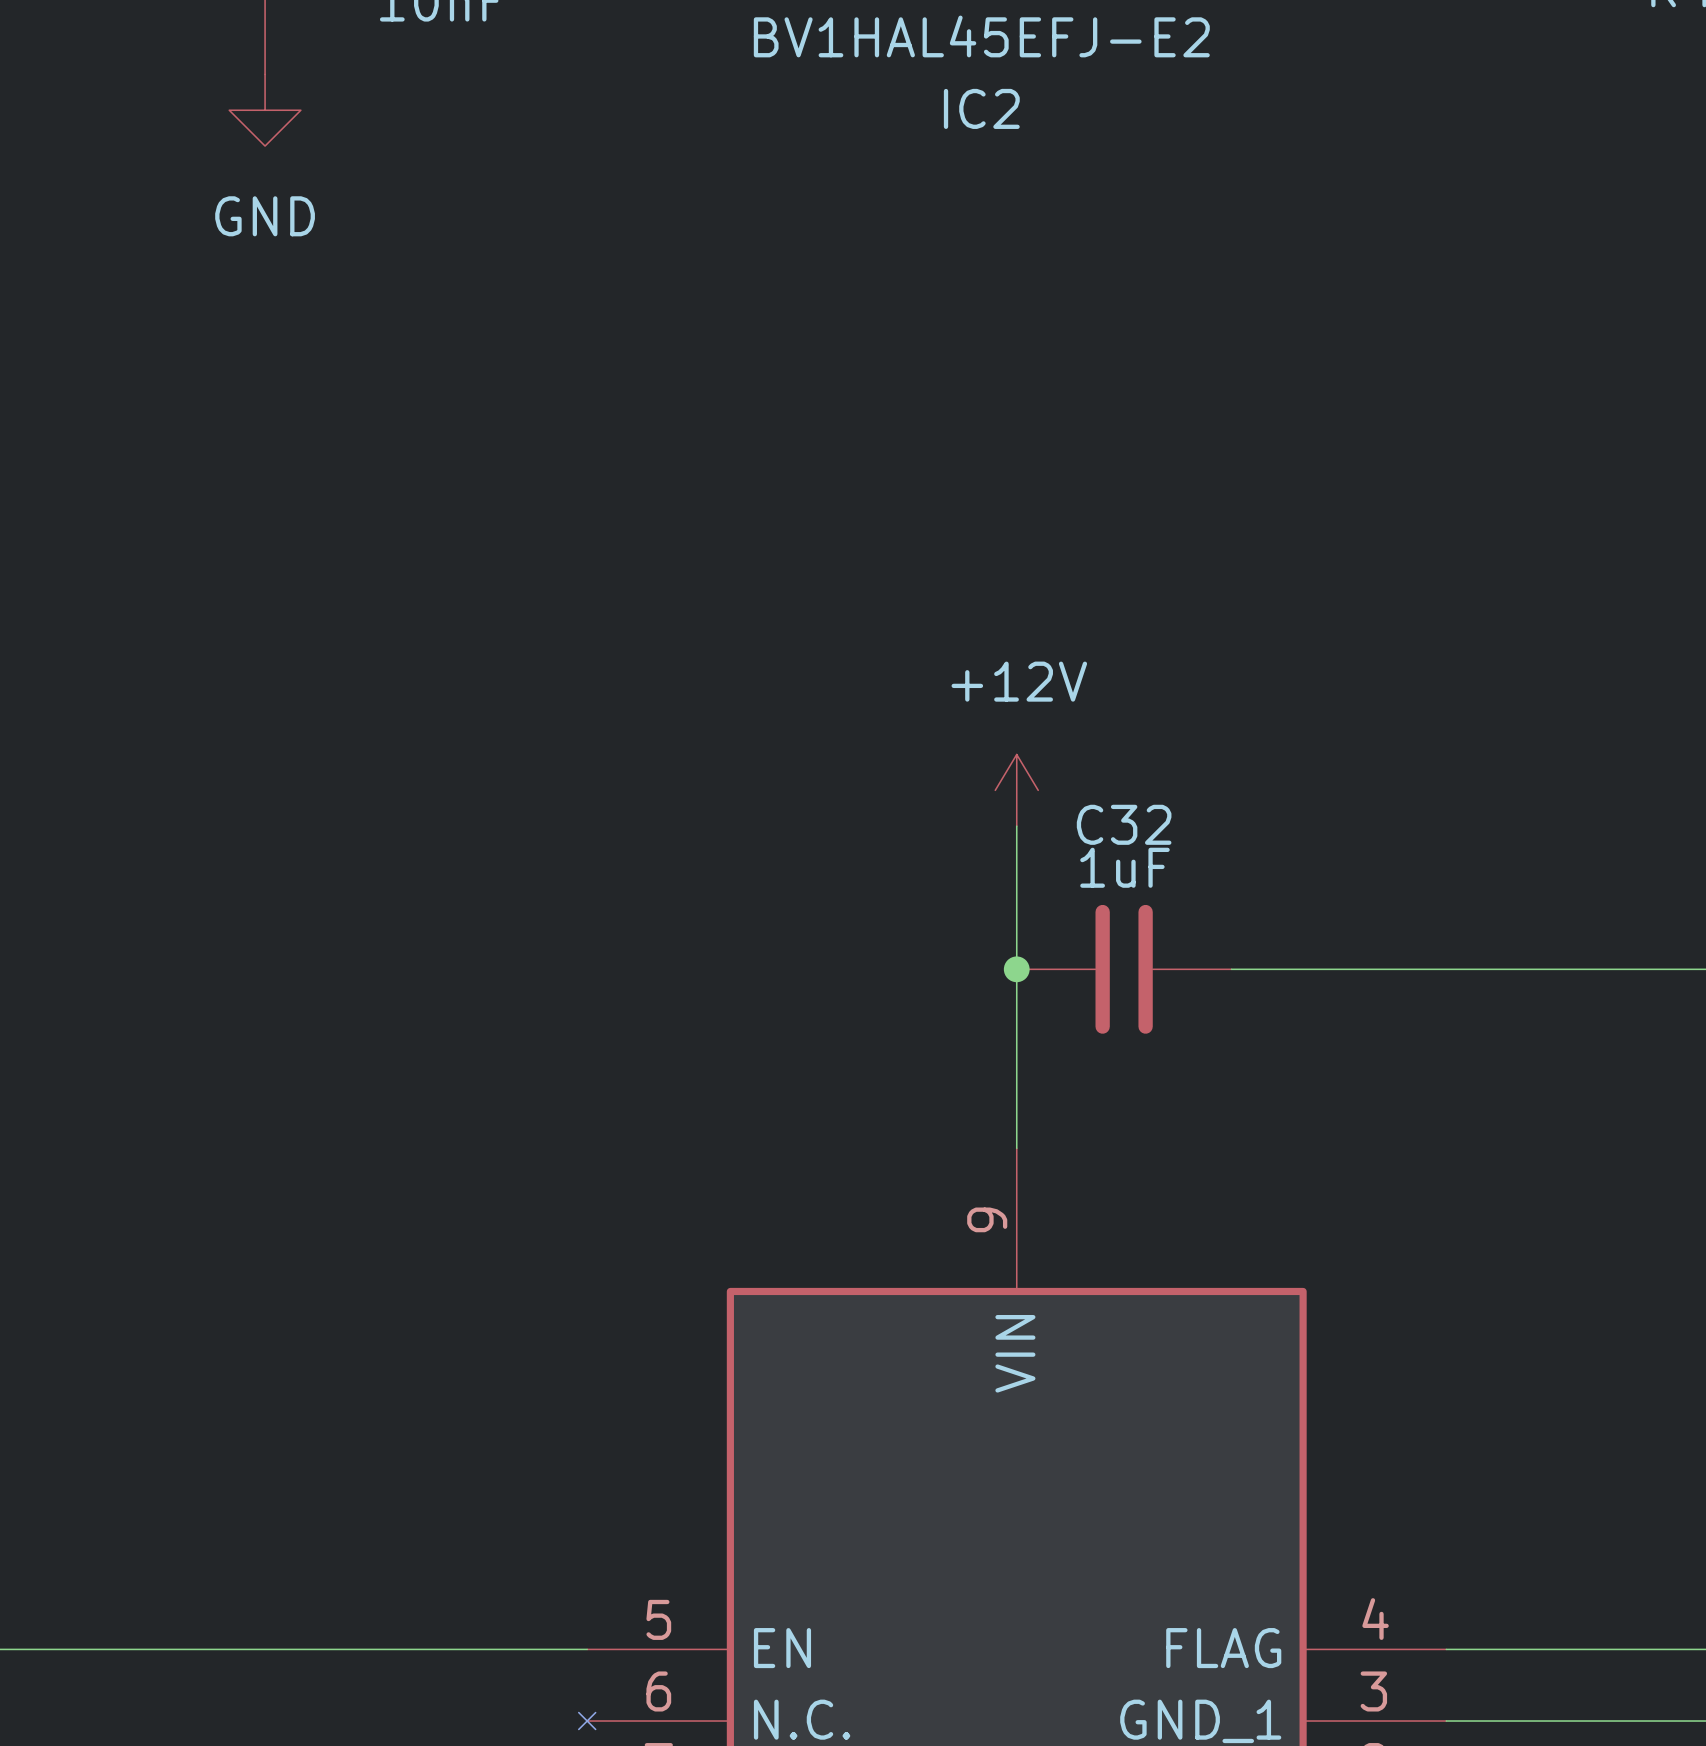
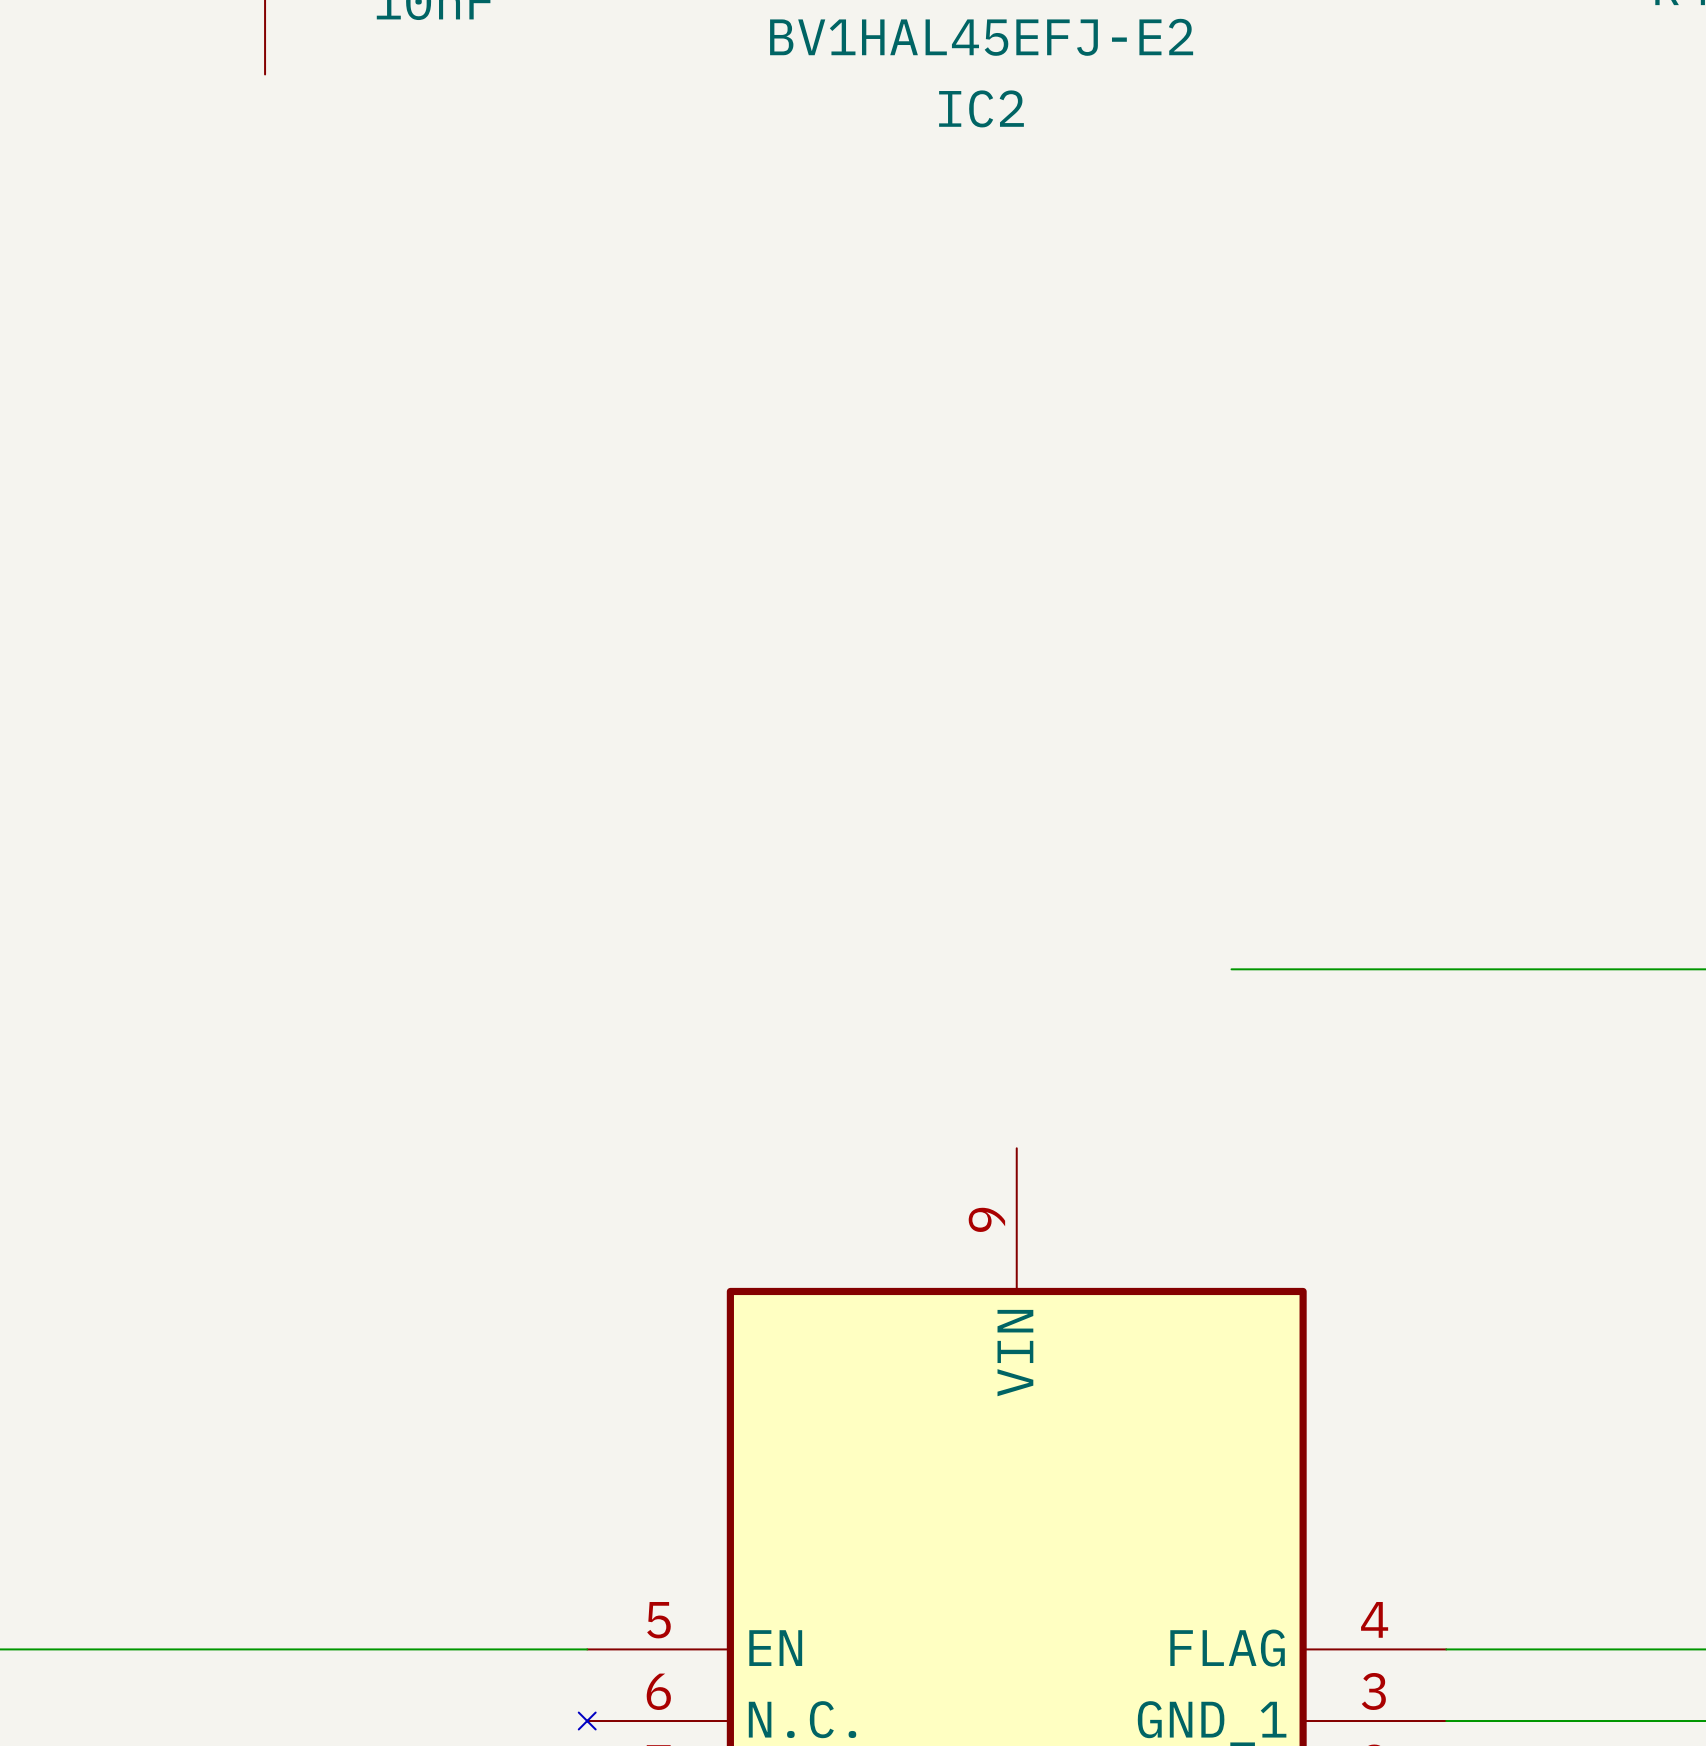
power symbol: GND (265, 110) -> none
power symbol: +12V (1016, 790) -> none
wire: (1016, 826) (1016, 1148) -> none
junction: (1016, 969) -> none
C32: 1uF (1124, 969) -> none

